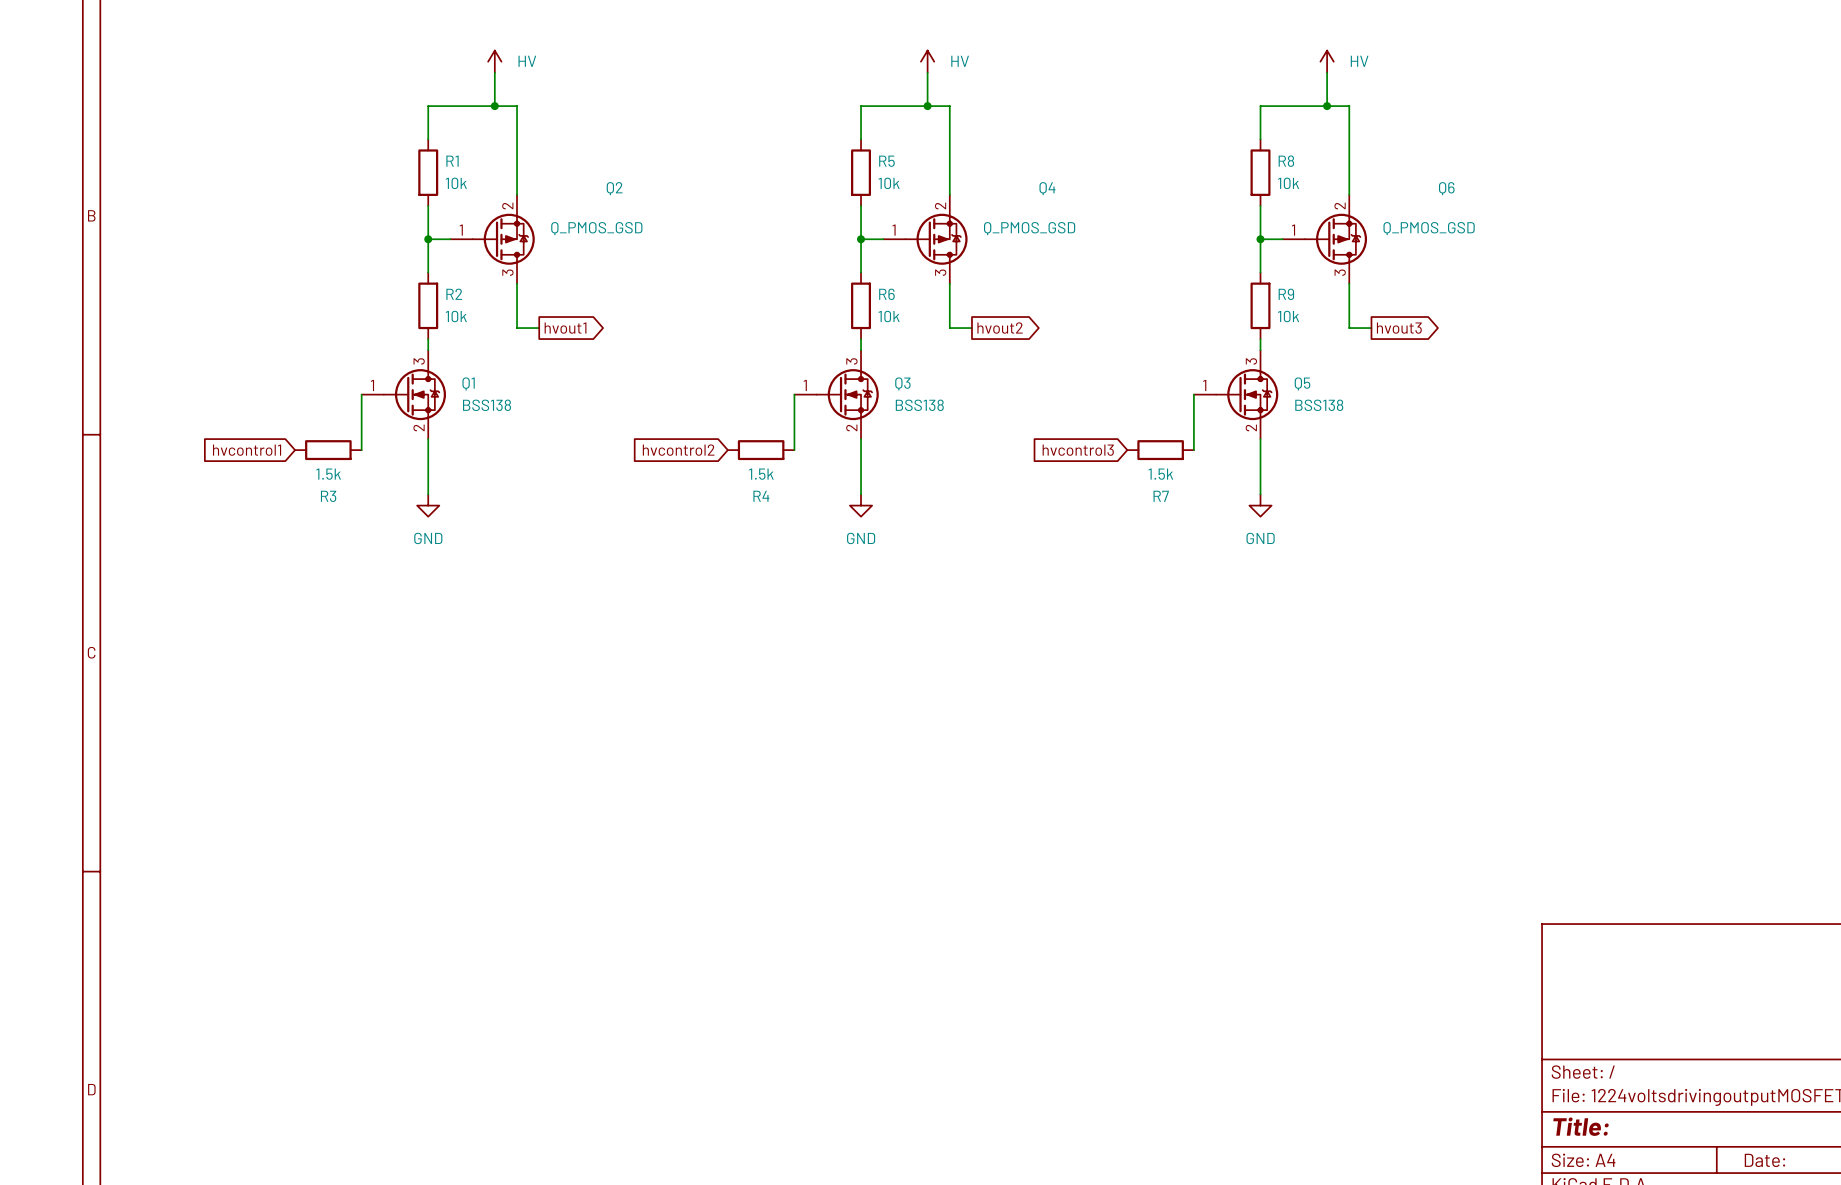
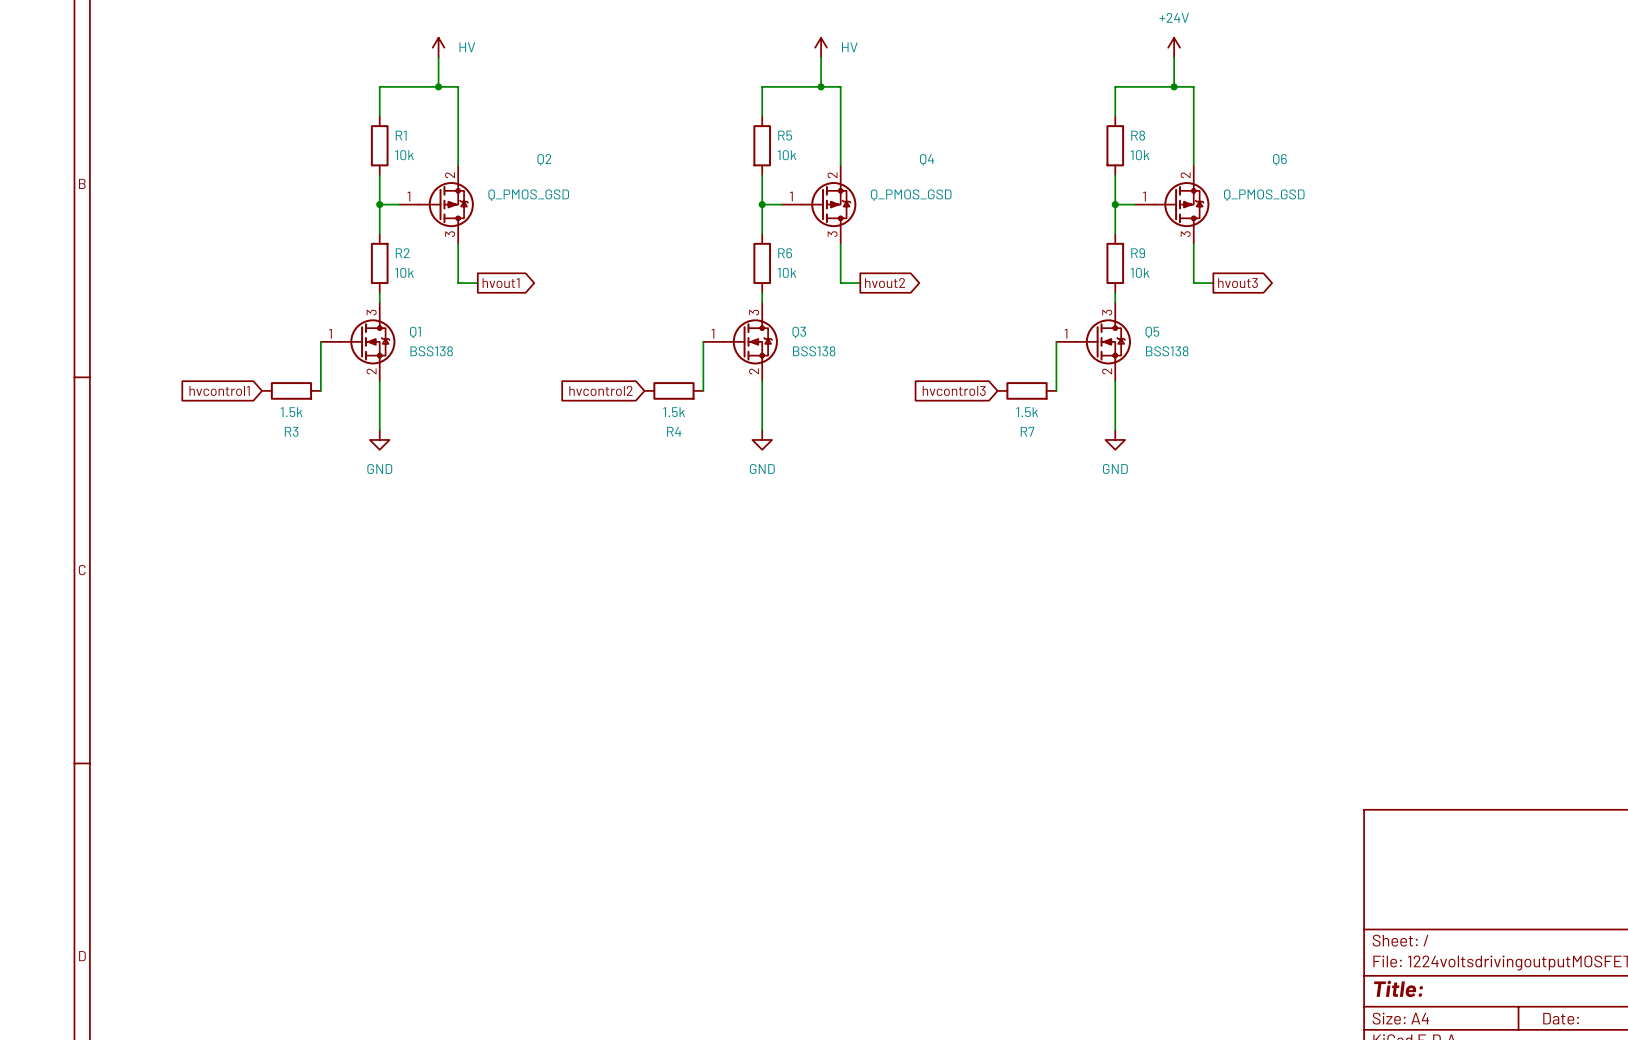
power symbol: HV (1327, 61) -> +24V (1174, 47)

